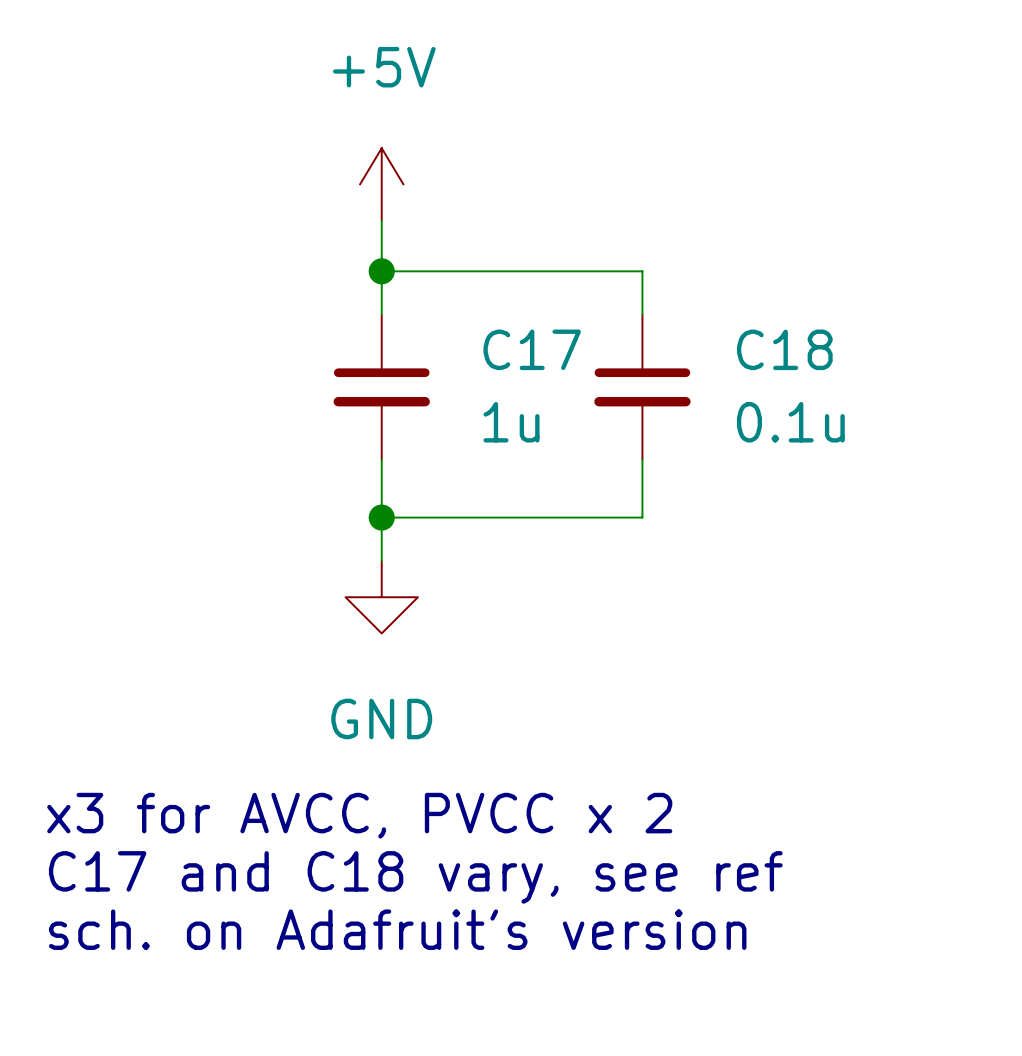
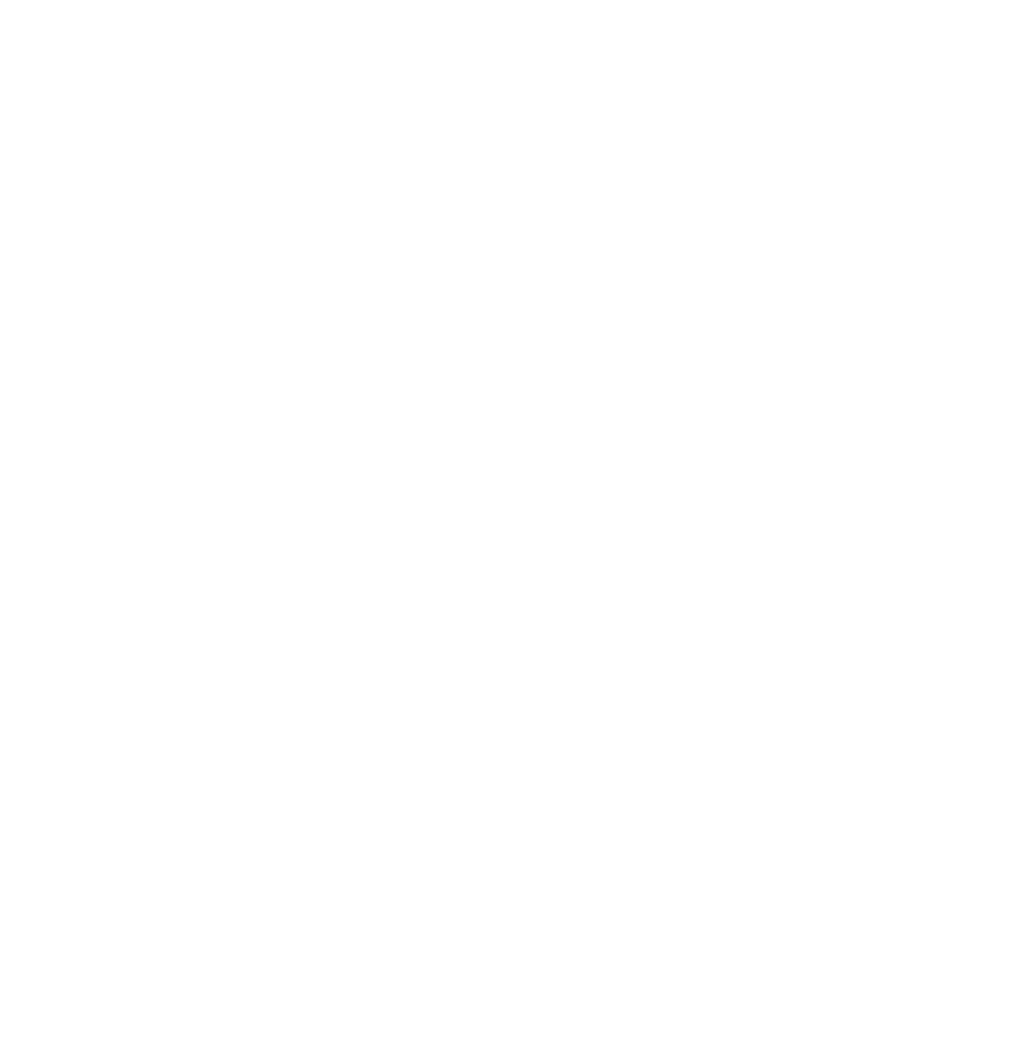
power symbol: +5V (381, 184) -> none
wire: (381, 220) (381, 314) -> none
wire: (381, 271) (642, 271) (642, 314) -> none
junction: (381, 271) -> none
C17: 1u (381, 387) -> none
C18: 0.1u (642, 387) -> none
wire: (381, 459) (381, 561) -> none
wire: (642, 459) (642, 517) (381, 517) -> none
junction: (381, 517) -> none
power symbol: GND (381, 597) -> none
text: x3 for AVCC, PVCC x 2 (359, 815) -> none
text: C17 and C18 vary, see ref (415, 877) -> none
text: sch. on Adafruit's version (397, 929) -> none

